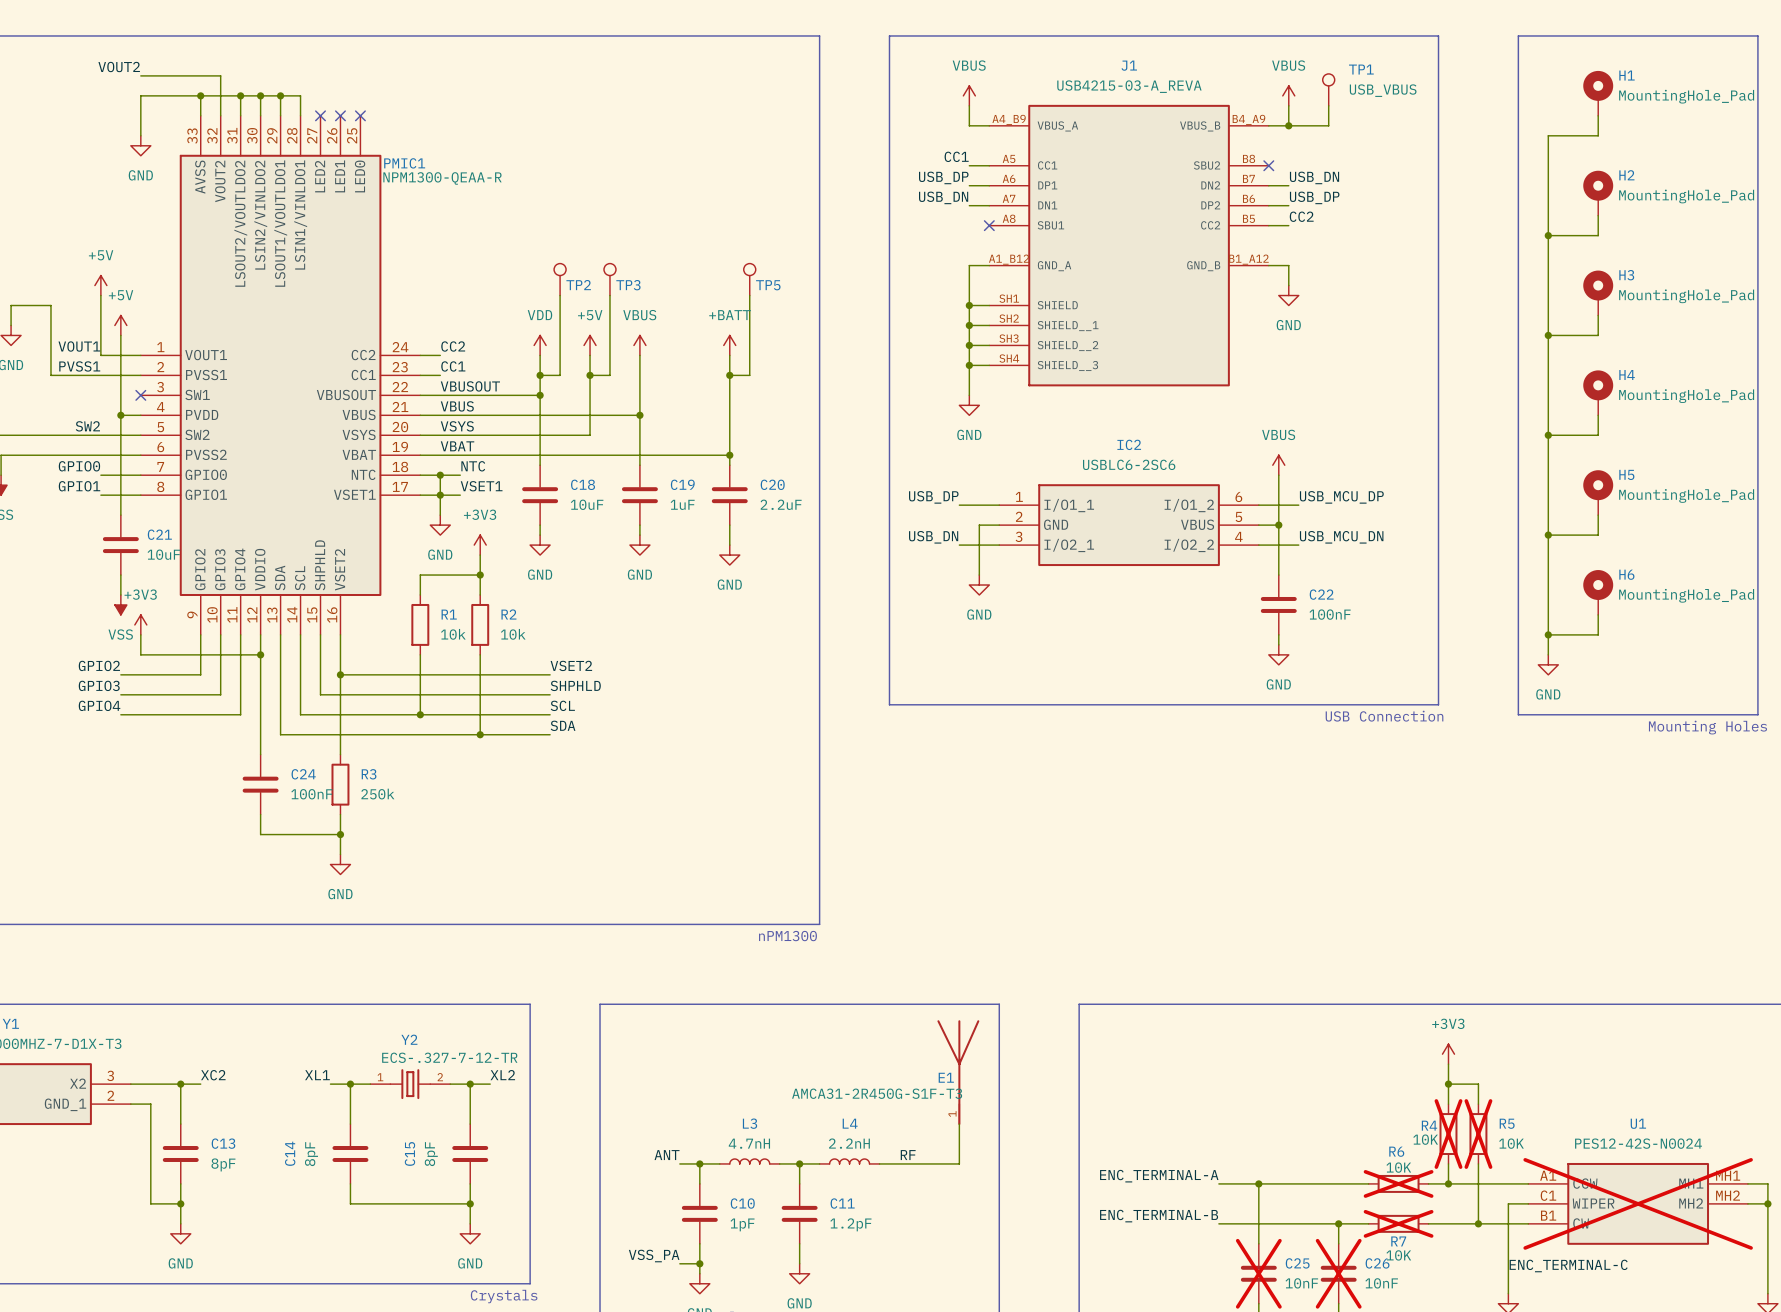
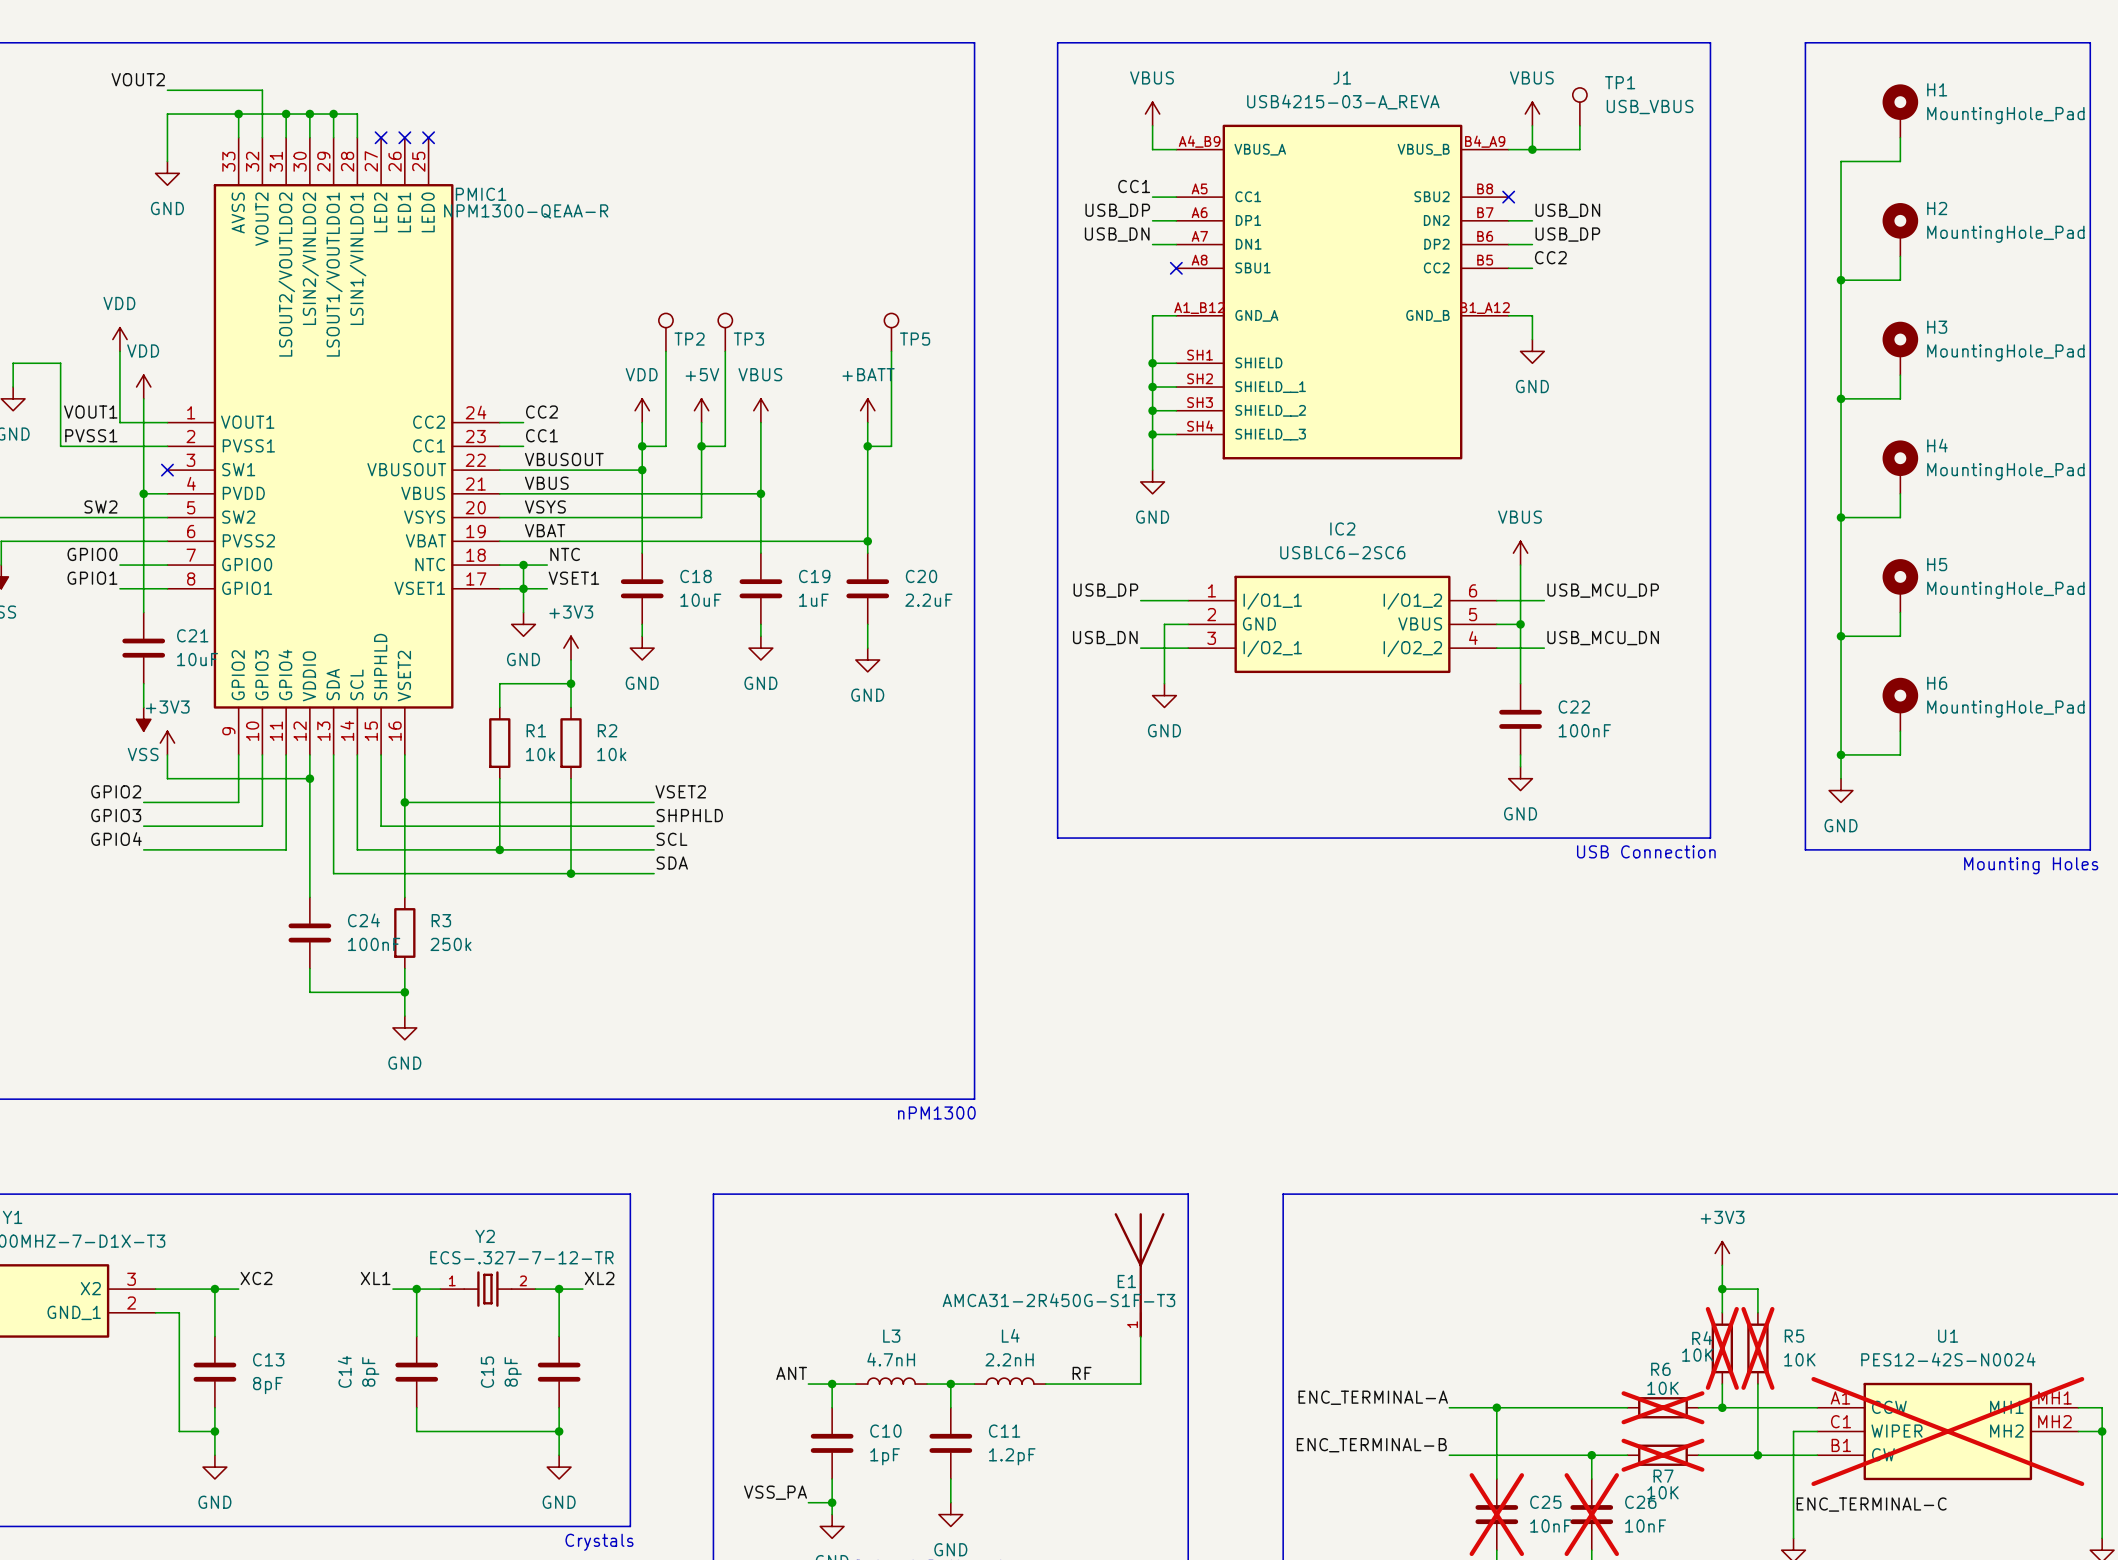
power symbol: +5V (100, 285) -> VDD (119, 339)
power symbol: +5V (120, 325) -> VDD (143, 387)

